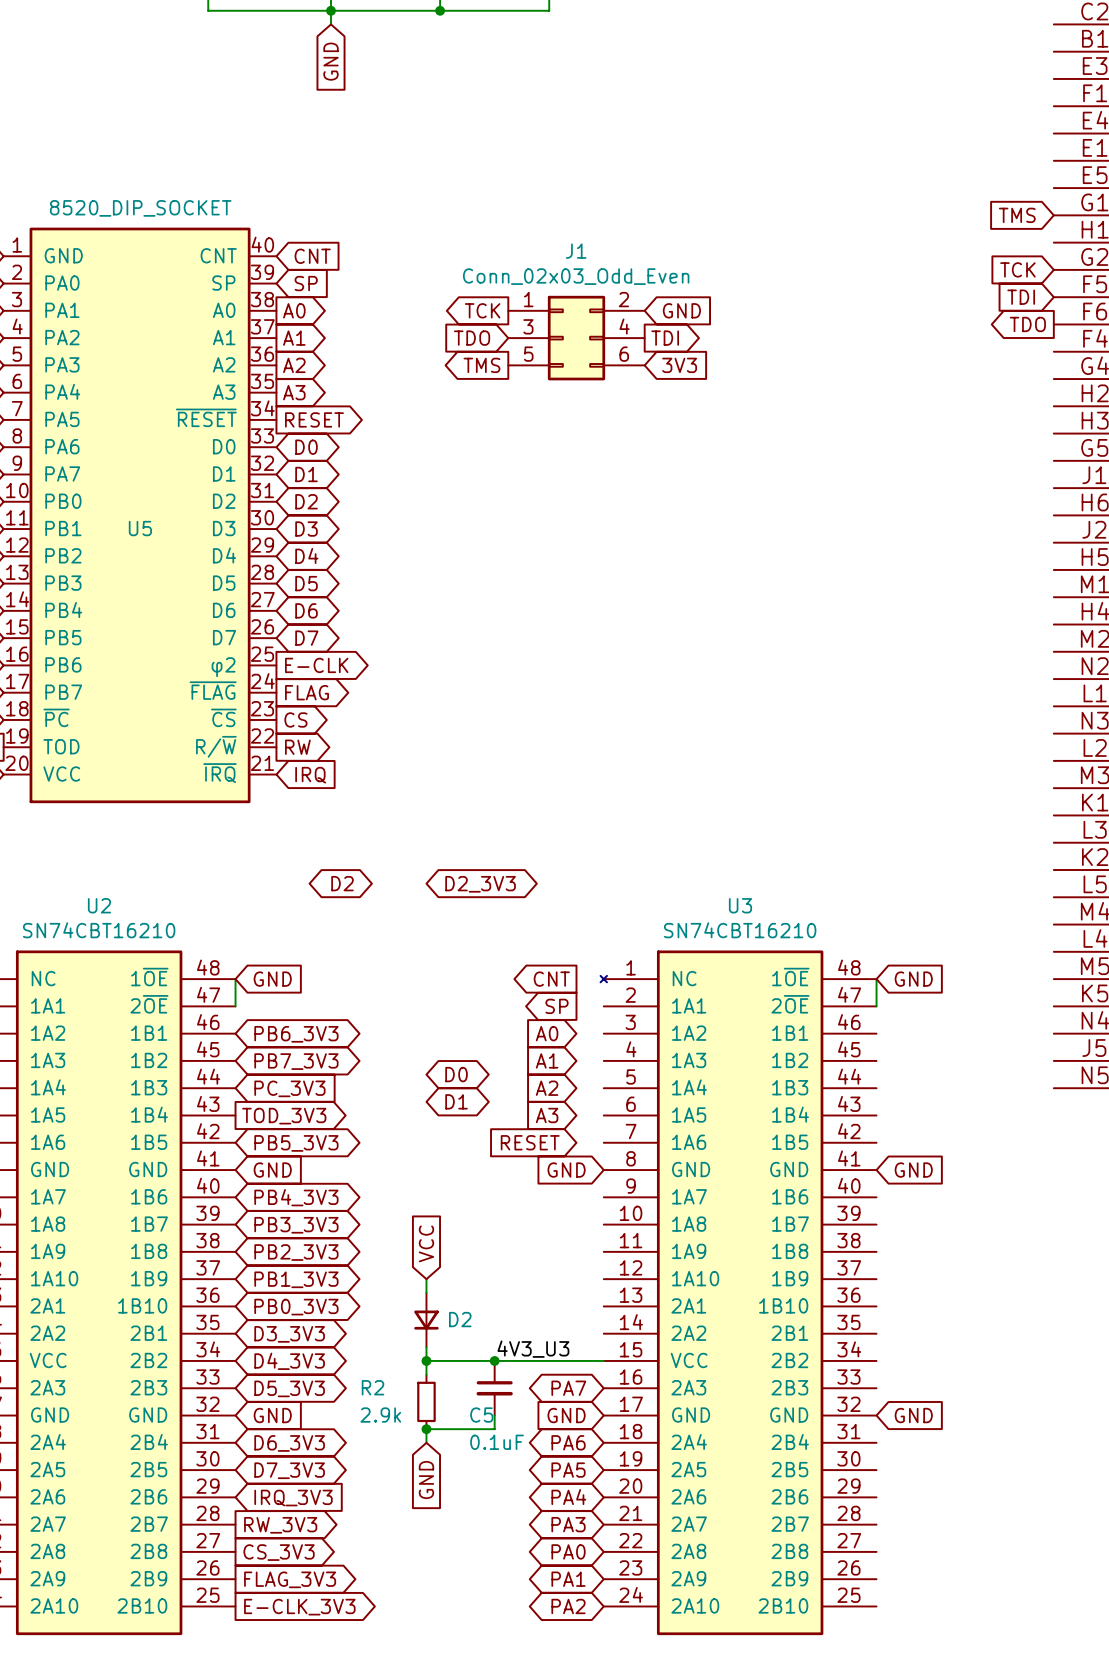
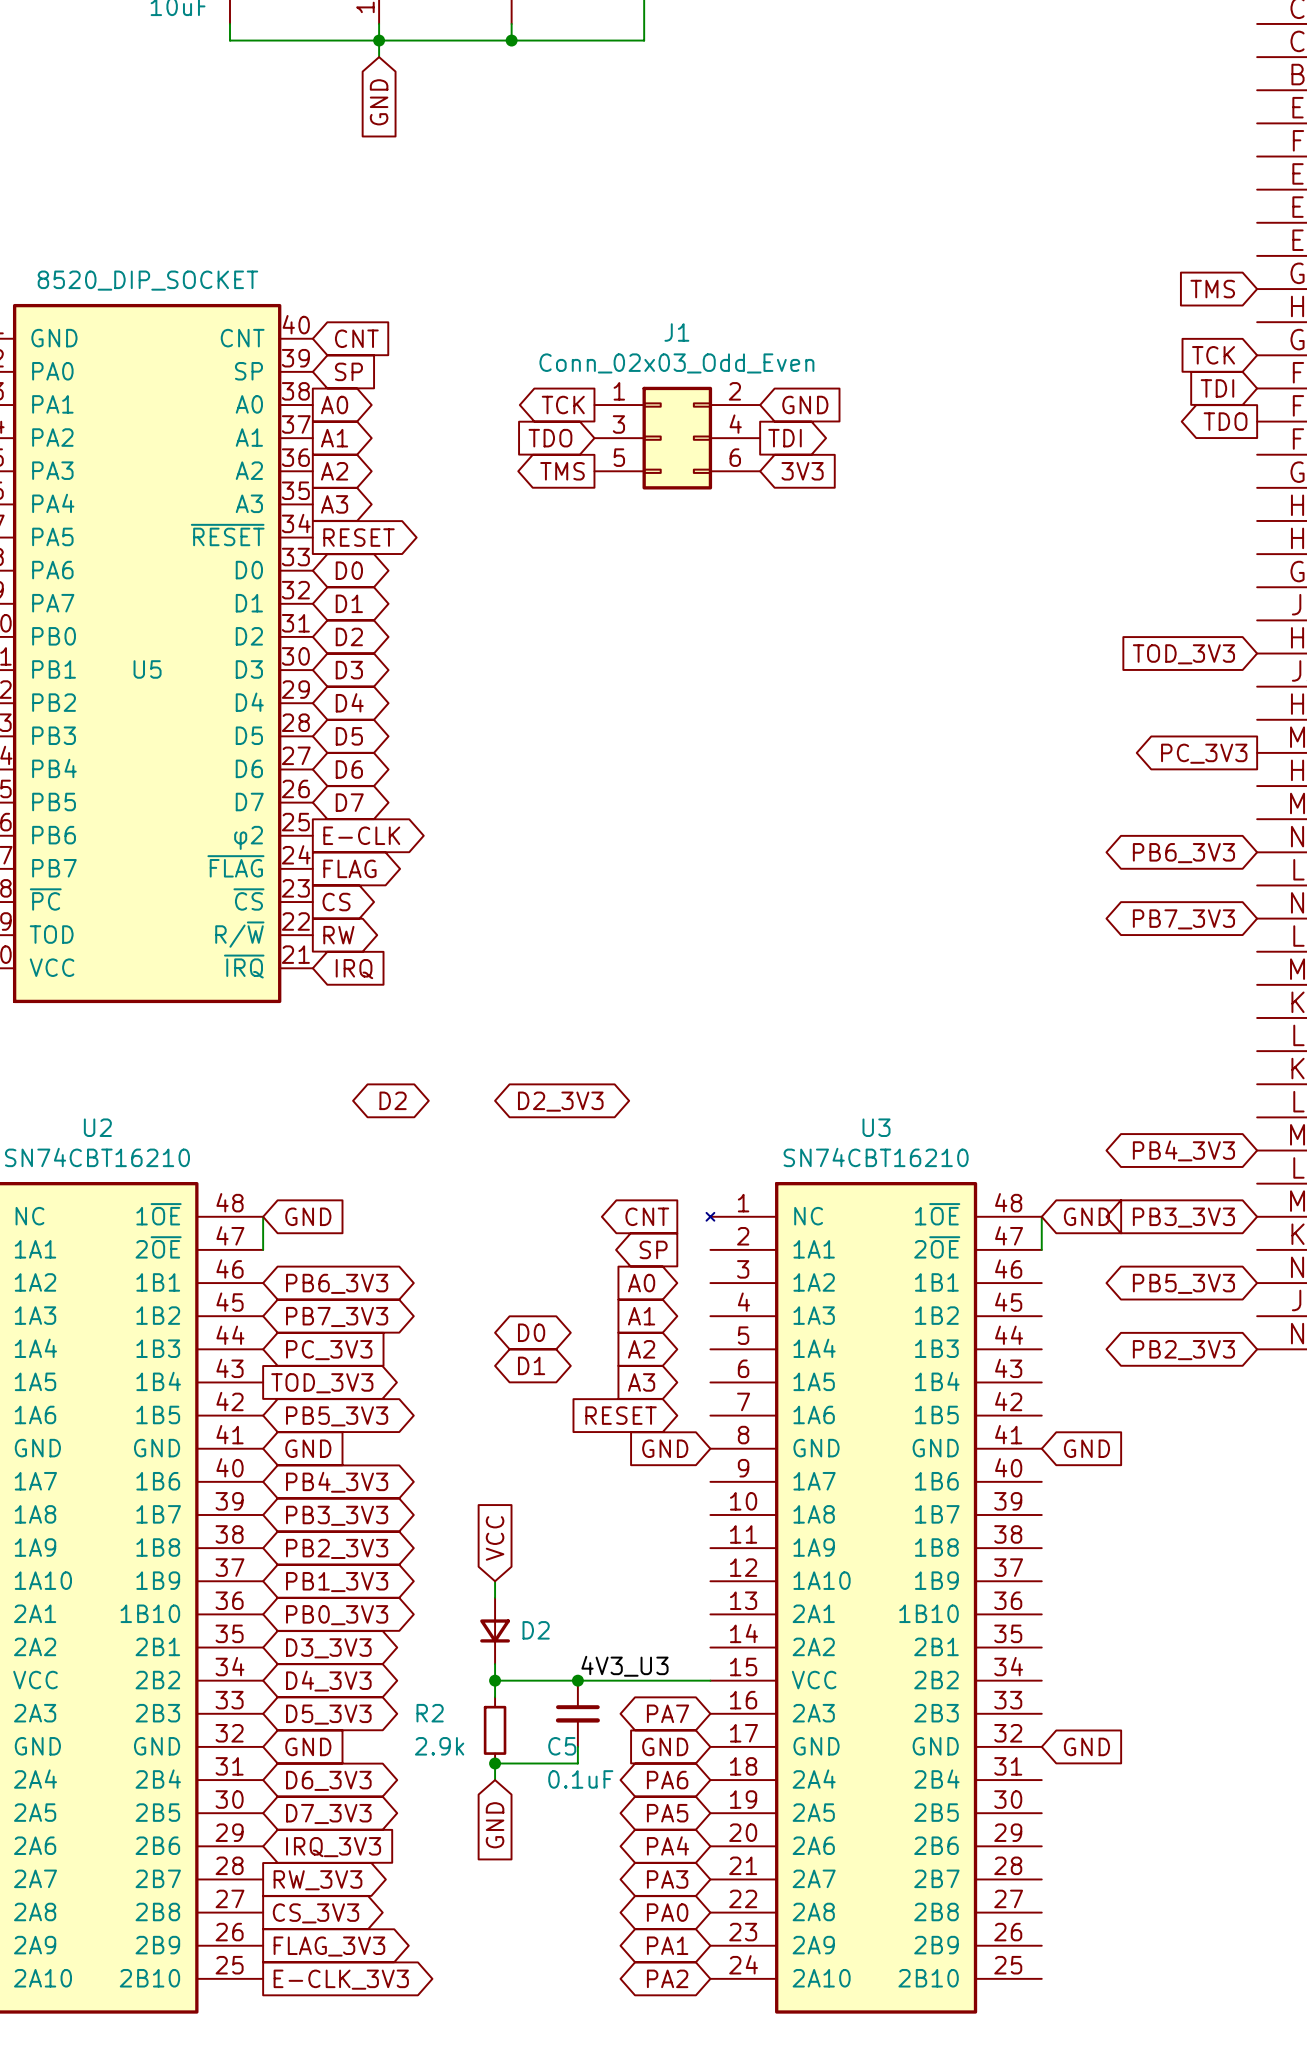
global label: none -> TOD_3V3 (1183, 654)
global label: none -> PC_3V3 (1204, 753)
global label: none -> PB6_3V3 (1183, 853)
global label: none -> PB7_3V3 (1183, 919)
global label: none -> PB4_3V3 (1183, 1150)
global label: none -> PB3_3V3 (1183, 1217)
global label: none -> PB5_3V3 (1183, 1283)
global label: none -> PB2_3V3 (1183, 1350)

